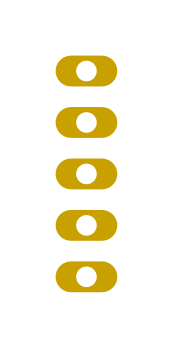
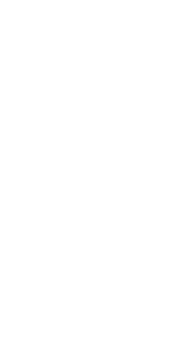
part: (86, 173) -> none

